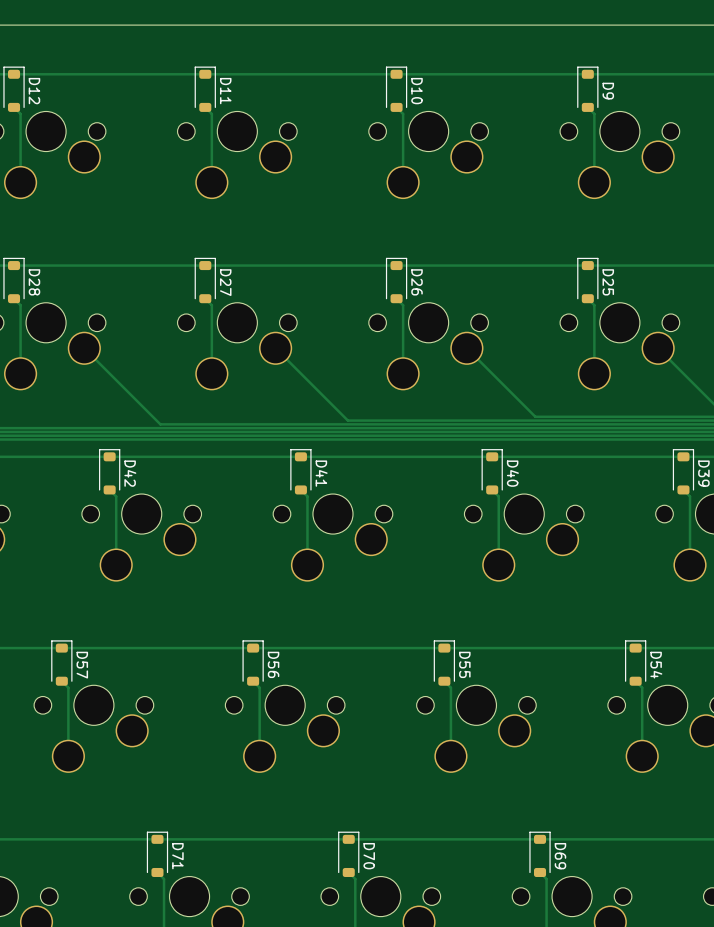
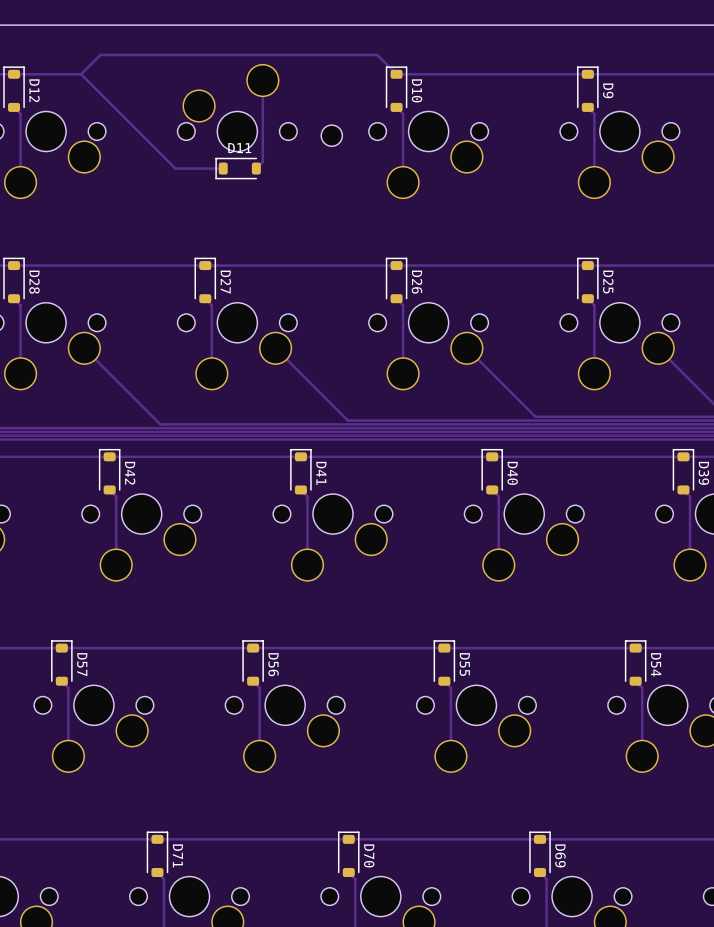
track: (396, 74) (81, 74) -> (396, 74) (377, 54) (100, 54) (81, 74) (175, 168) (223, 168)
track: none -> (262, 80) (262, 162) (256, 168)
D11 rotation: 0° (205, 89) -> 90° counterclockwise (238, 168)
D11 position: (205, 89) -> (238, 168)
track: (205, 107) (211, 113) (211, 182) (205, 175) -> none
part: none -> (331, 135)
part rotation: 0° (237, 155) -> 180° (237, 107)

